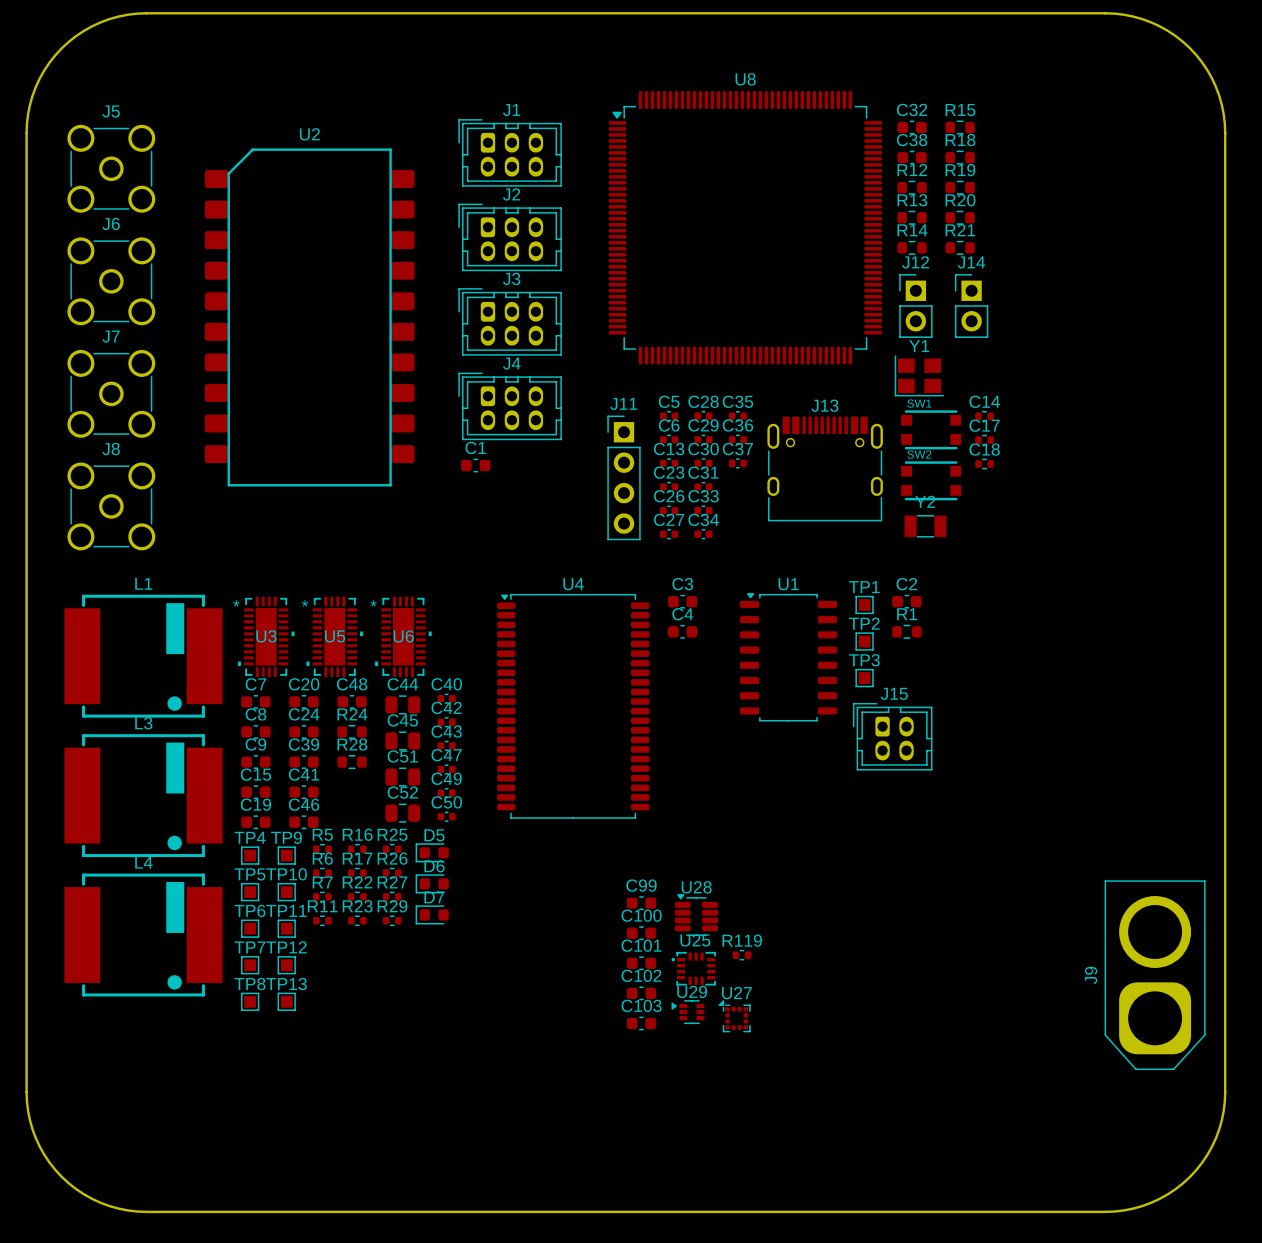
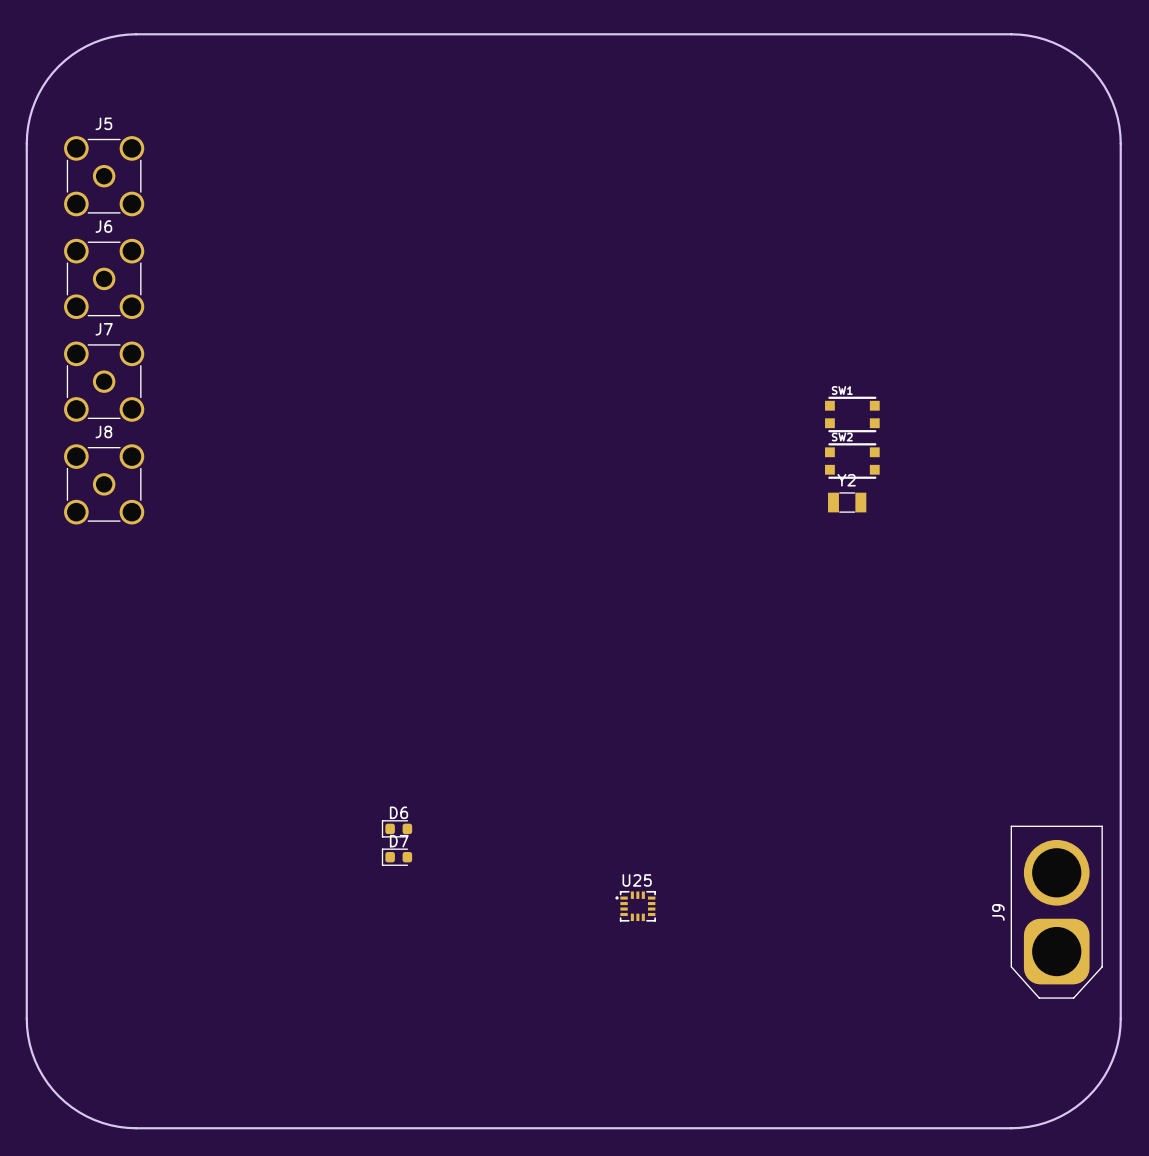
C32: (912, 127) -> none
R15: (960, 127) -> none
J1: (510, 152) -> none
C38: (912, 157) -> none
R18: (960, 157) -> none
R12: (912, 187) -> none
R19: (960, 187) -> none
R13: (912, 217) -> none
R20: (960, 217) -> none
U8: (745, 227) -> none
J2: (510, 237) -> none
R14: (912, 247) -> none
R21: (960, 247) -> none
J12: (915, 306) -> none
J14: (971, 306) -> none
U2: (309, 317) -> none
J3: (510, 321) -> none
Y1: (919, 375) -> none
J4: (510, 406) -> none
C5: (669, 416) -> none
C28: (703, 416) -> none
C35: (737, 416) -> none
C14: (984, 416) -> none
C6: (669, 439) -> none
C29: (703, 439) -> none
C36: (737, 439) -> none
C17: (984, 440) -> none
C13: (669, 463) -> none
C30: (703, 463) -> none
C37: (737, 463) -> none
C18: (984, 463) -> none
C1: (475, 465) -> none
J13: (825, 468) -> none
J11: (624, 477) -> none
C23: (669, 487) -> none
C31: (703, 487) -> none
C26: (669, 510) -> none
C33: (703, 510) -> none
C27: (669, 534) -> none
C34: (703, 534) -> none
C3: (682, 601) -> none
C2: (906, 601) -> none
TP1: (864, 604) -> none
C4: (682, 631) -> none
R1: (906, 631) -> none
U3: (266, 636) -> none
U5: (334, 636) -> none
U6: (403, 636) -> none
TP2: (864, 641) -> none
L1: (143, 656) -> none
U1: (788, 657) -> none
TP3: (864, 678) -> none
C40: (446, 698) -> none
C7: (255, 701) -> none
C20: (303, 701) -> none
C48: (352, 701) -> none
C44: (402, 704) -> none
U4: (573, 706) -> none
C42: (446, 722) -> none
C8: (255, 732) -> none
C24: (303, 732) -> none
R24: (352, 732) -> none
J15: (892, 736) -> none
C45: (402, 740) -> none
C43: (446, 745) -> none
C9: (255, 762) -> none
C39: (303, 762) -> none
R28: (352, 762) -> none
C47: (446, 769) -> none
C51: (402, 777) -> none
C15: (255, 792) -> none
C41: (303, 792) -> none
C49: (446, 793) -> none
L3: (143, 795) -> none
C52: (402, 813) -> none
C50: (446, 816) -> none
C19: (255, 822) -> none
C46: (303, 822) -> none
R5: (322, 849) -> none
R16: (357, 849) -> none
R25: (392, 849) -> none
D5: (432, 852) -> none
TP4: (250, 855) -> none
TP9: (286, 855) -> none
R6: (322, 873) -> none
R17: (357, 873) -> none
R26: (392, 873) -> none
TP5: (250, 892) -> none
TP10: (286, 892) -> none
R7: (322, 896) -> none
R22: (357, 896) -> none
R27: (392, 896) -> none
C99: (641, 903) -> none
U28: (696, 915) -> none
R11: (322, 920) -> none
R23: (357, 920) -> none
R29: (392, 920) -> none
TP6: (250, 928) -> none
TP11: (286, 928) -> none
C100: (641, 933) -> none
L4: (143, 935) -> none
R119: (741, 955) -> none
C101: (641, 963) -> none
TP7: (250, 965) -> none
TP12: (286, 965) -> none
C102: (641, 993) -> none
TP8: (250, 1001) -> none
TP13: (286, 1001) -> none
U29: (687, 1012) -> none
U27: (734, 1016) -> none
C103: (641, 1023) -> none

